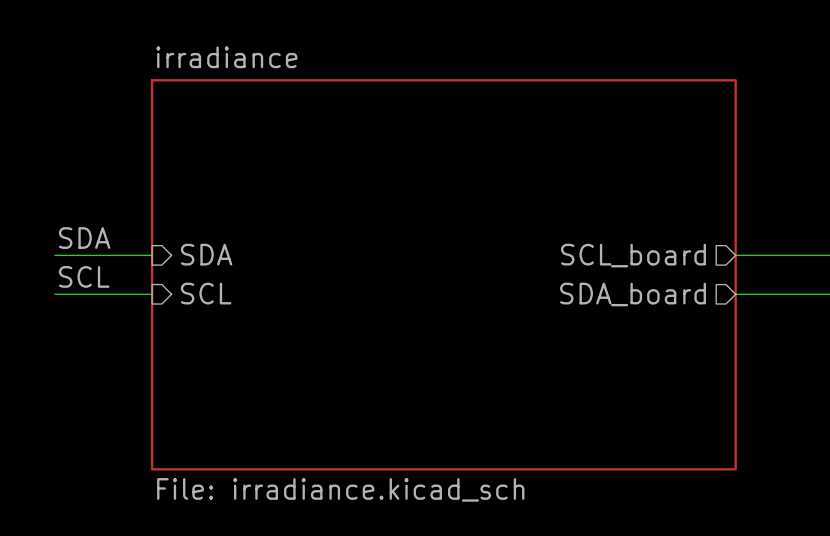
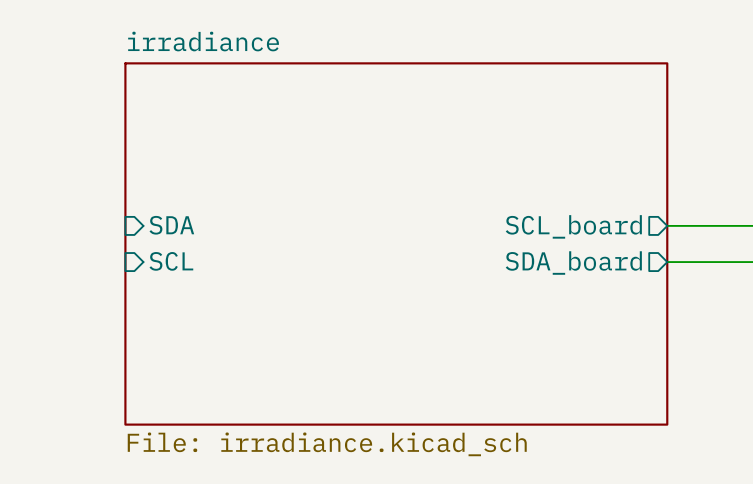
label: SDA (84, 238) -> none
wire: (54, 255) (152, 255) -> none
label: SCL (84, 276) -> none
wire: (54, 294) (152, 294) -> none

